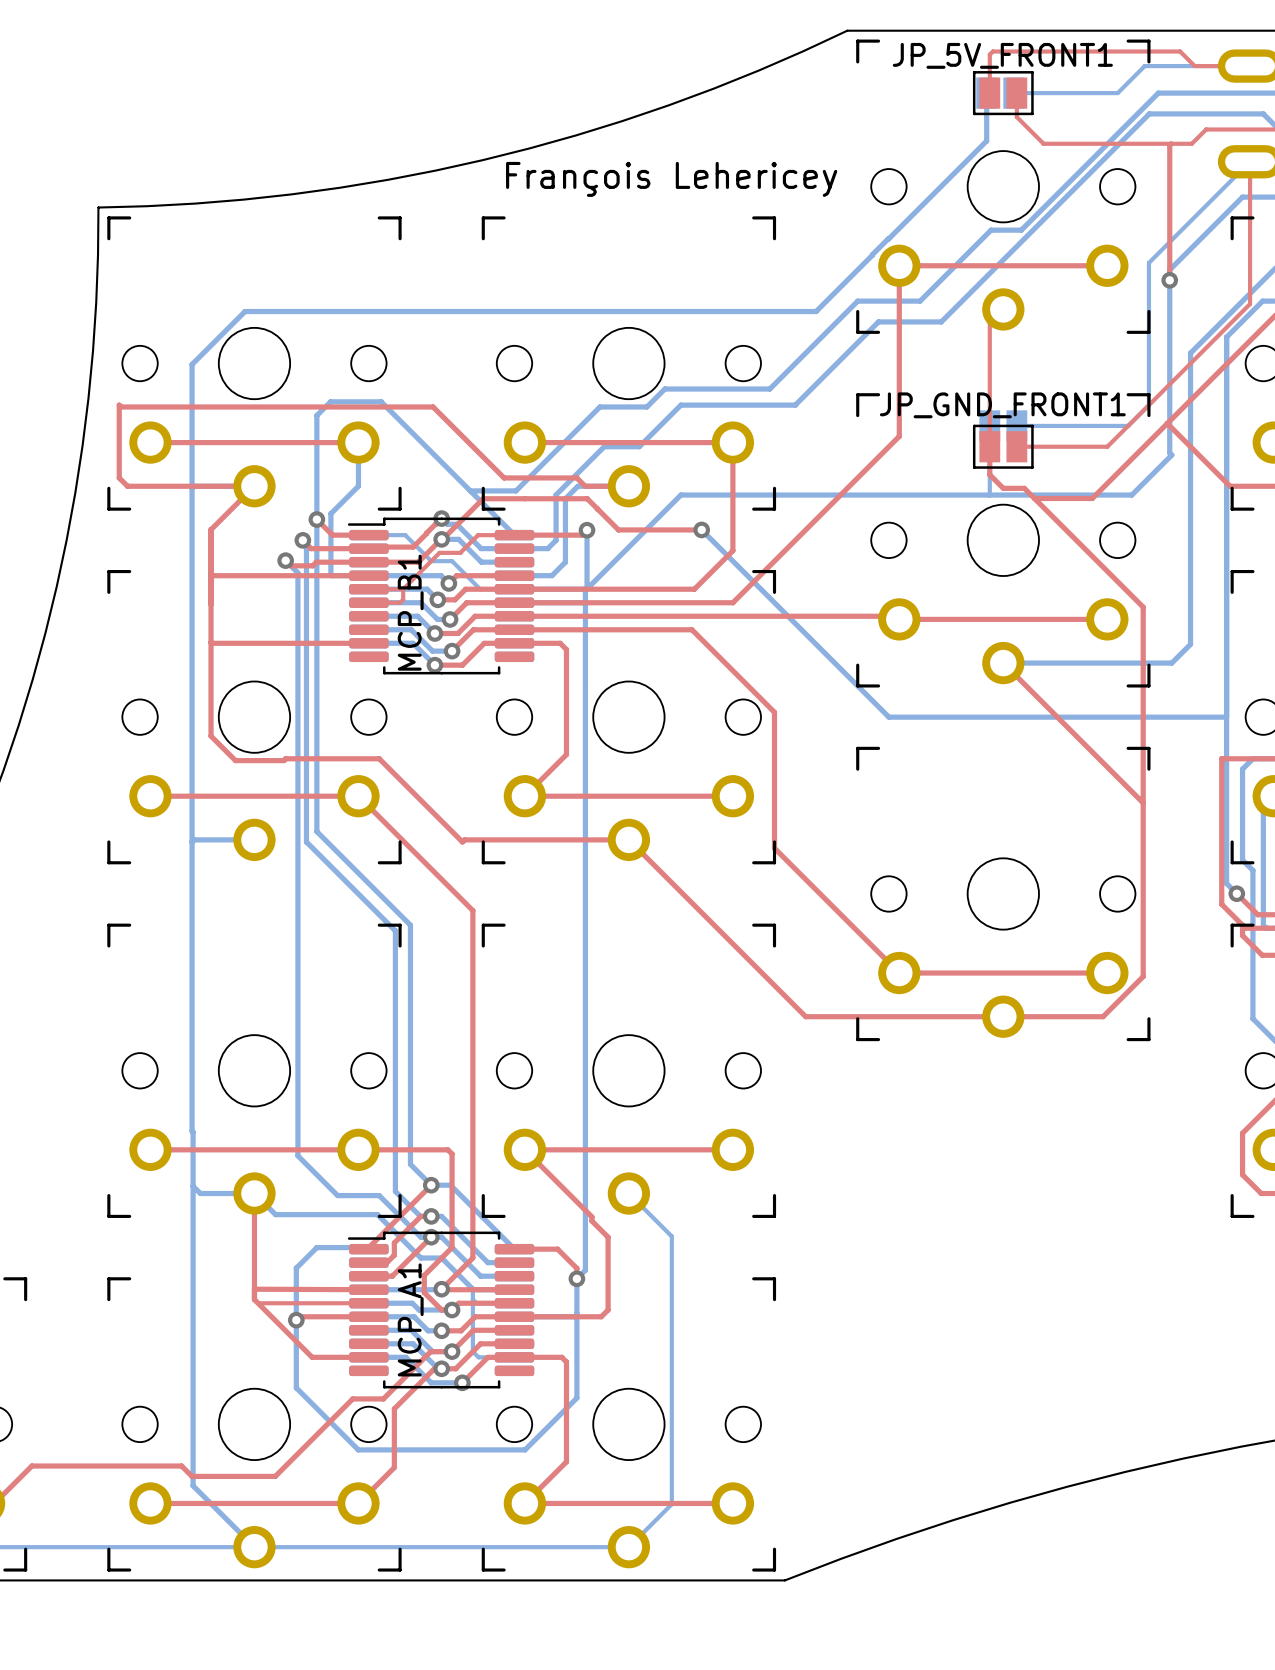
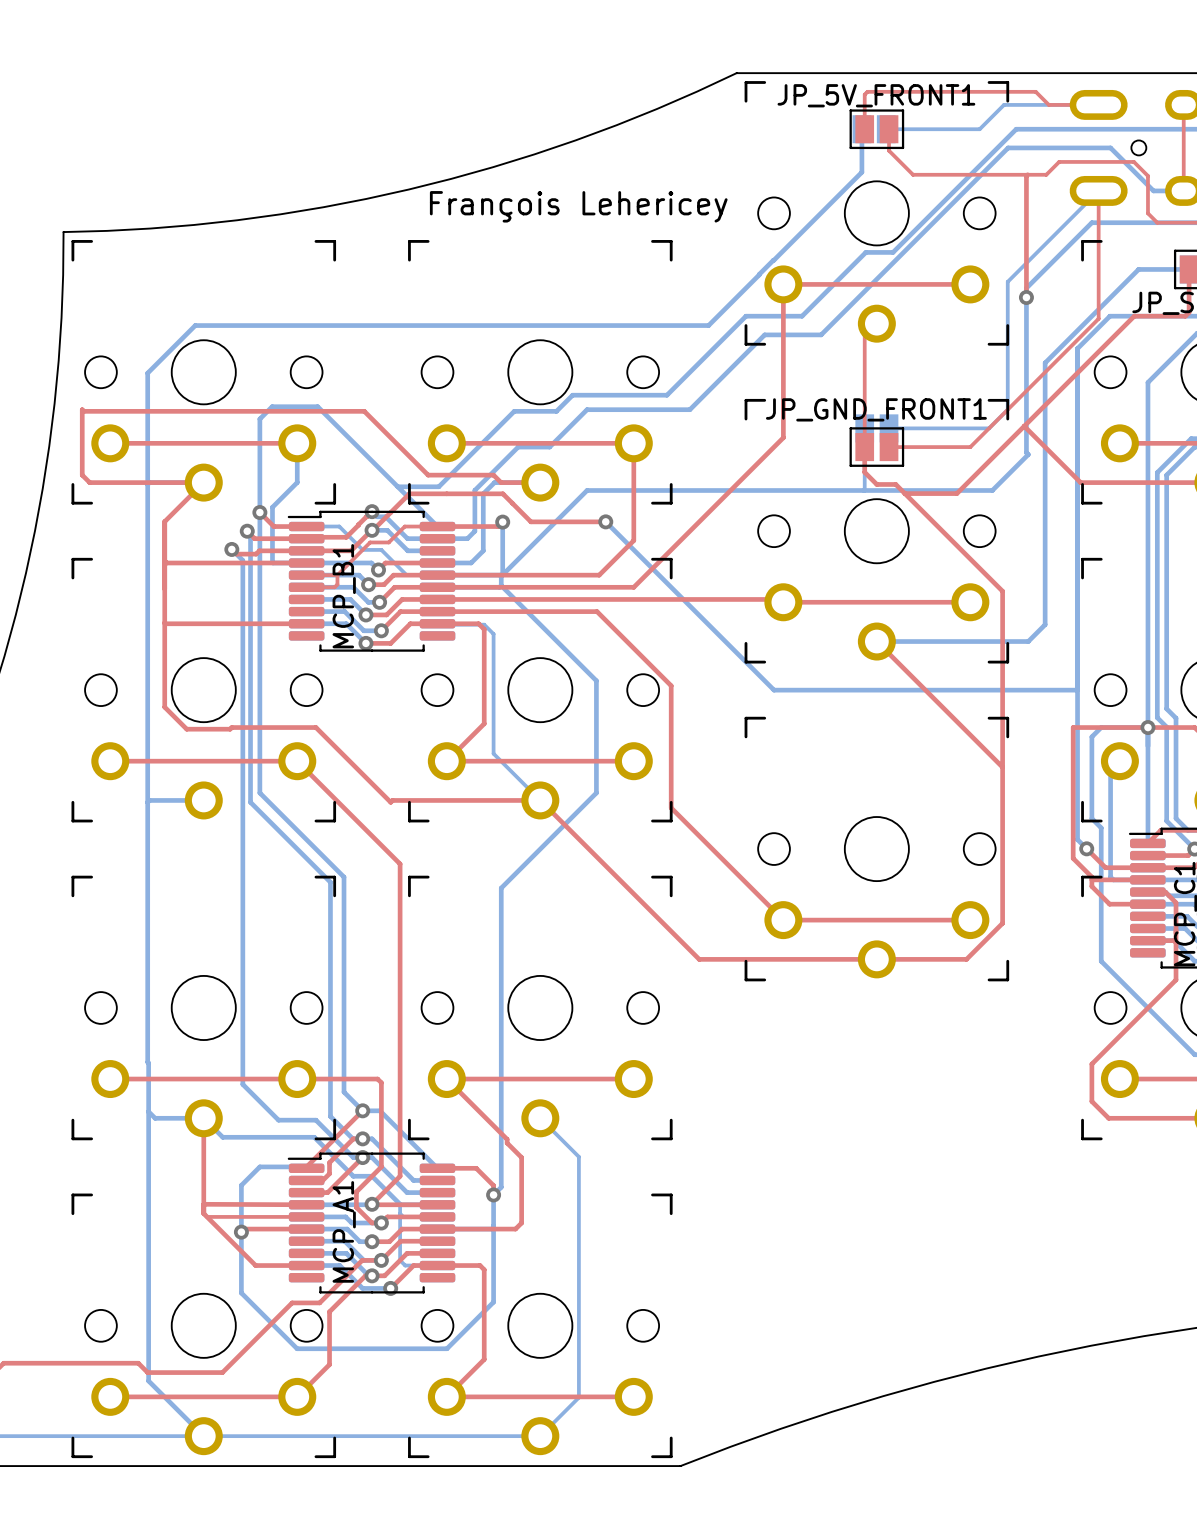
bottom track: (585, 600) (585, 937) -> (501, 585) (596, 680) (596, 792) (501, 888)
bottom track: none -> (437, 623) (484, 624) (493, 634) (493, 753) (540, 800)

